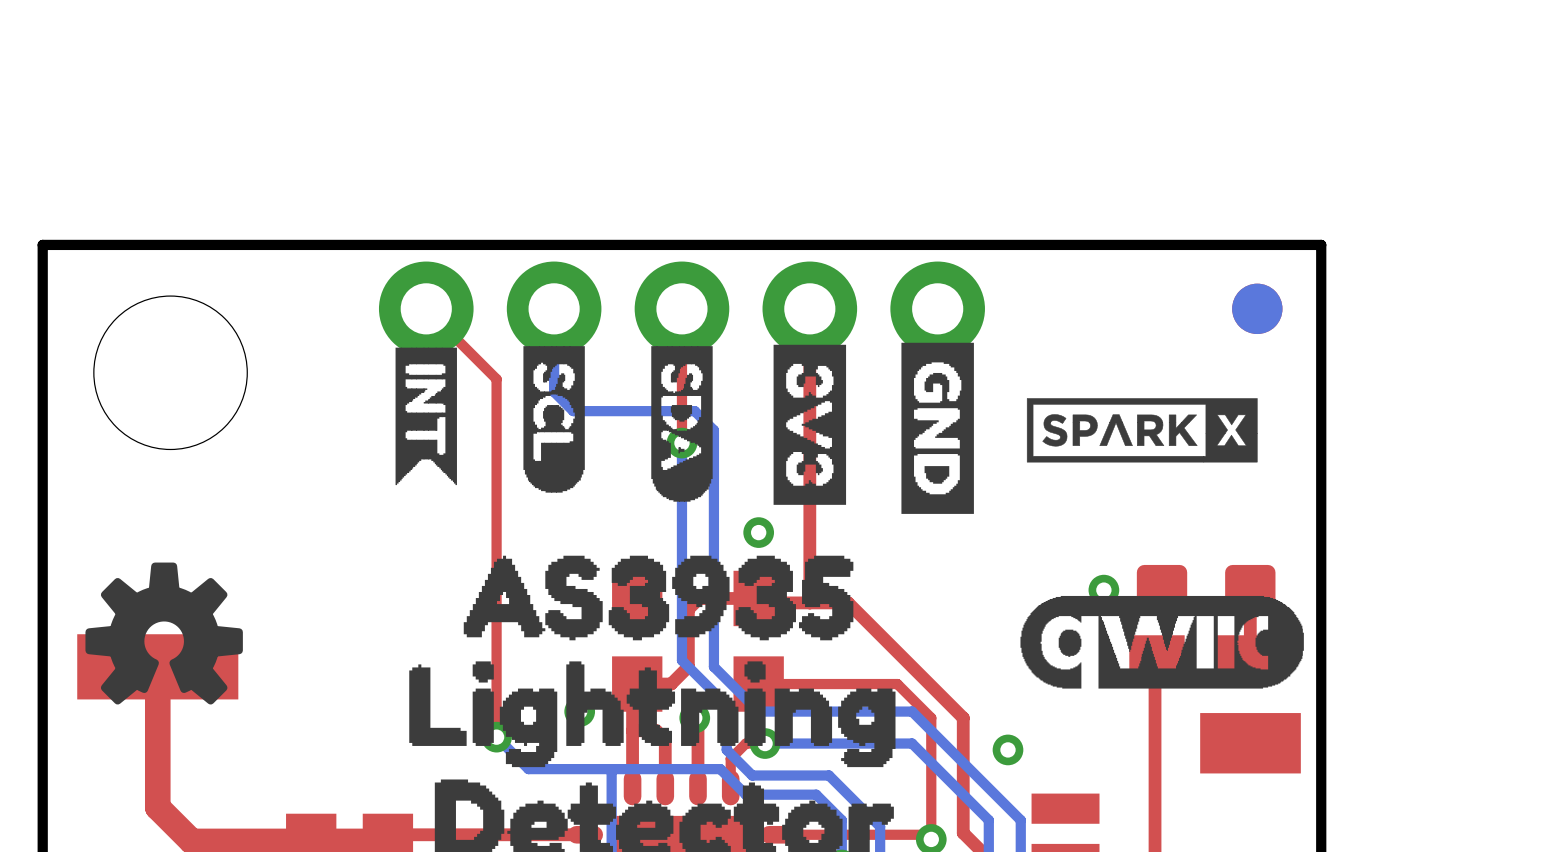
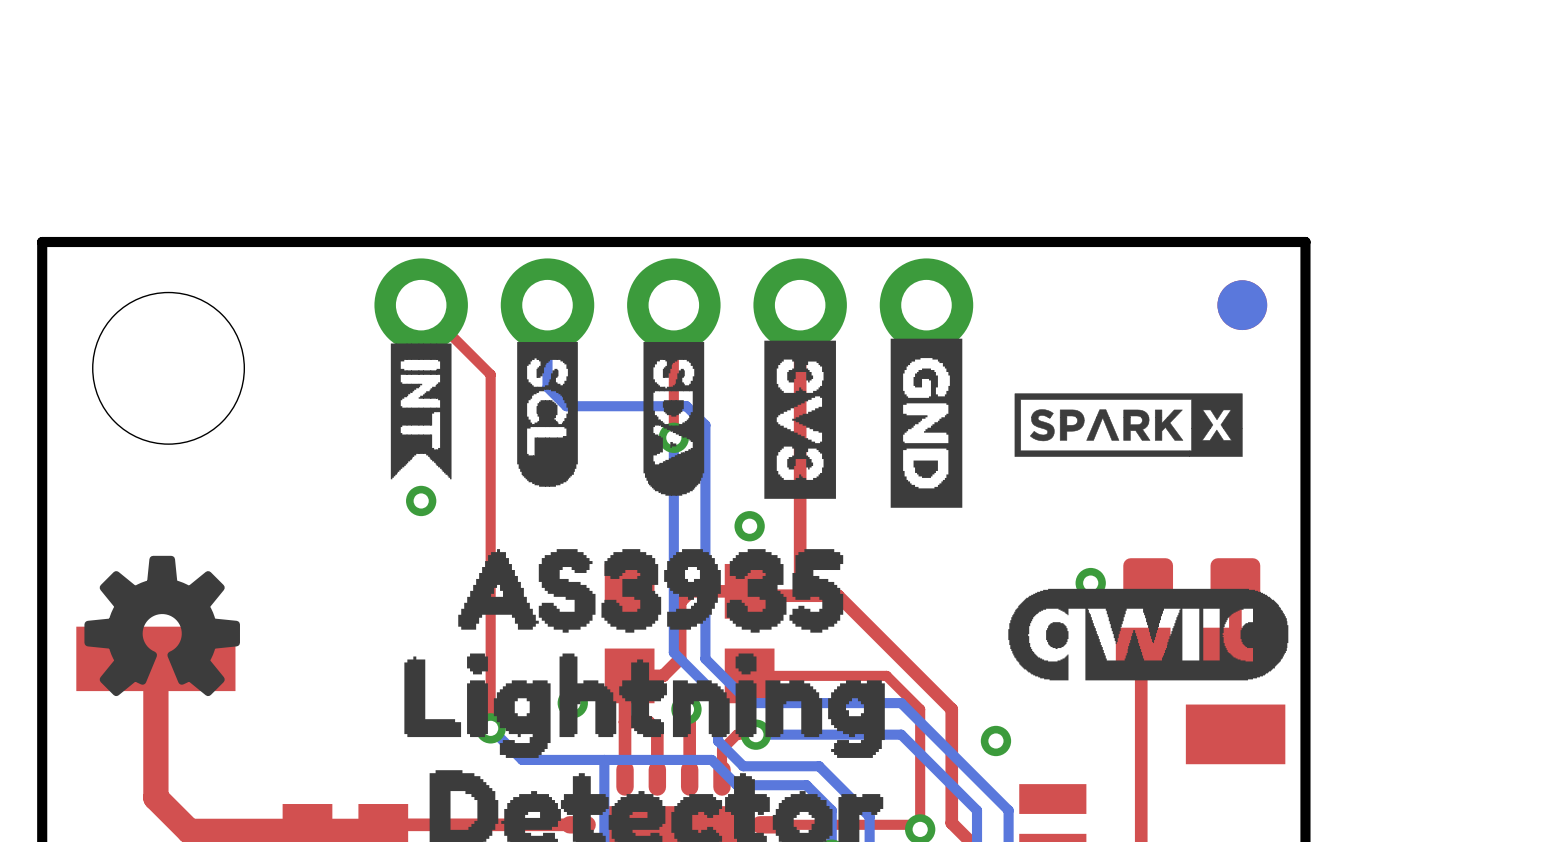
via: none -> (421, 500)

